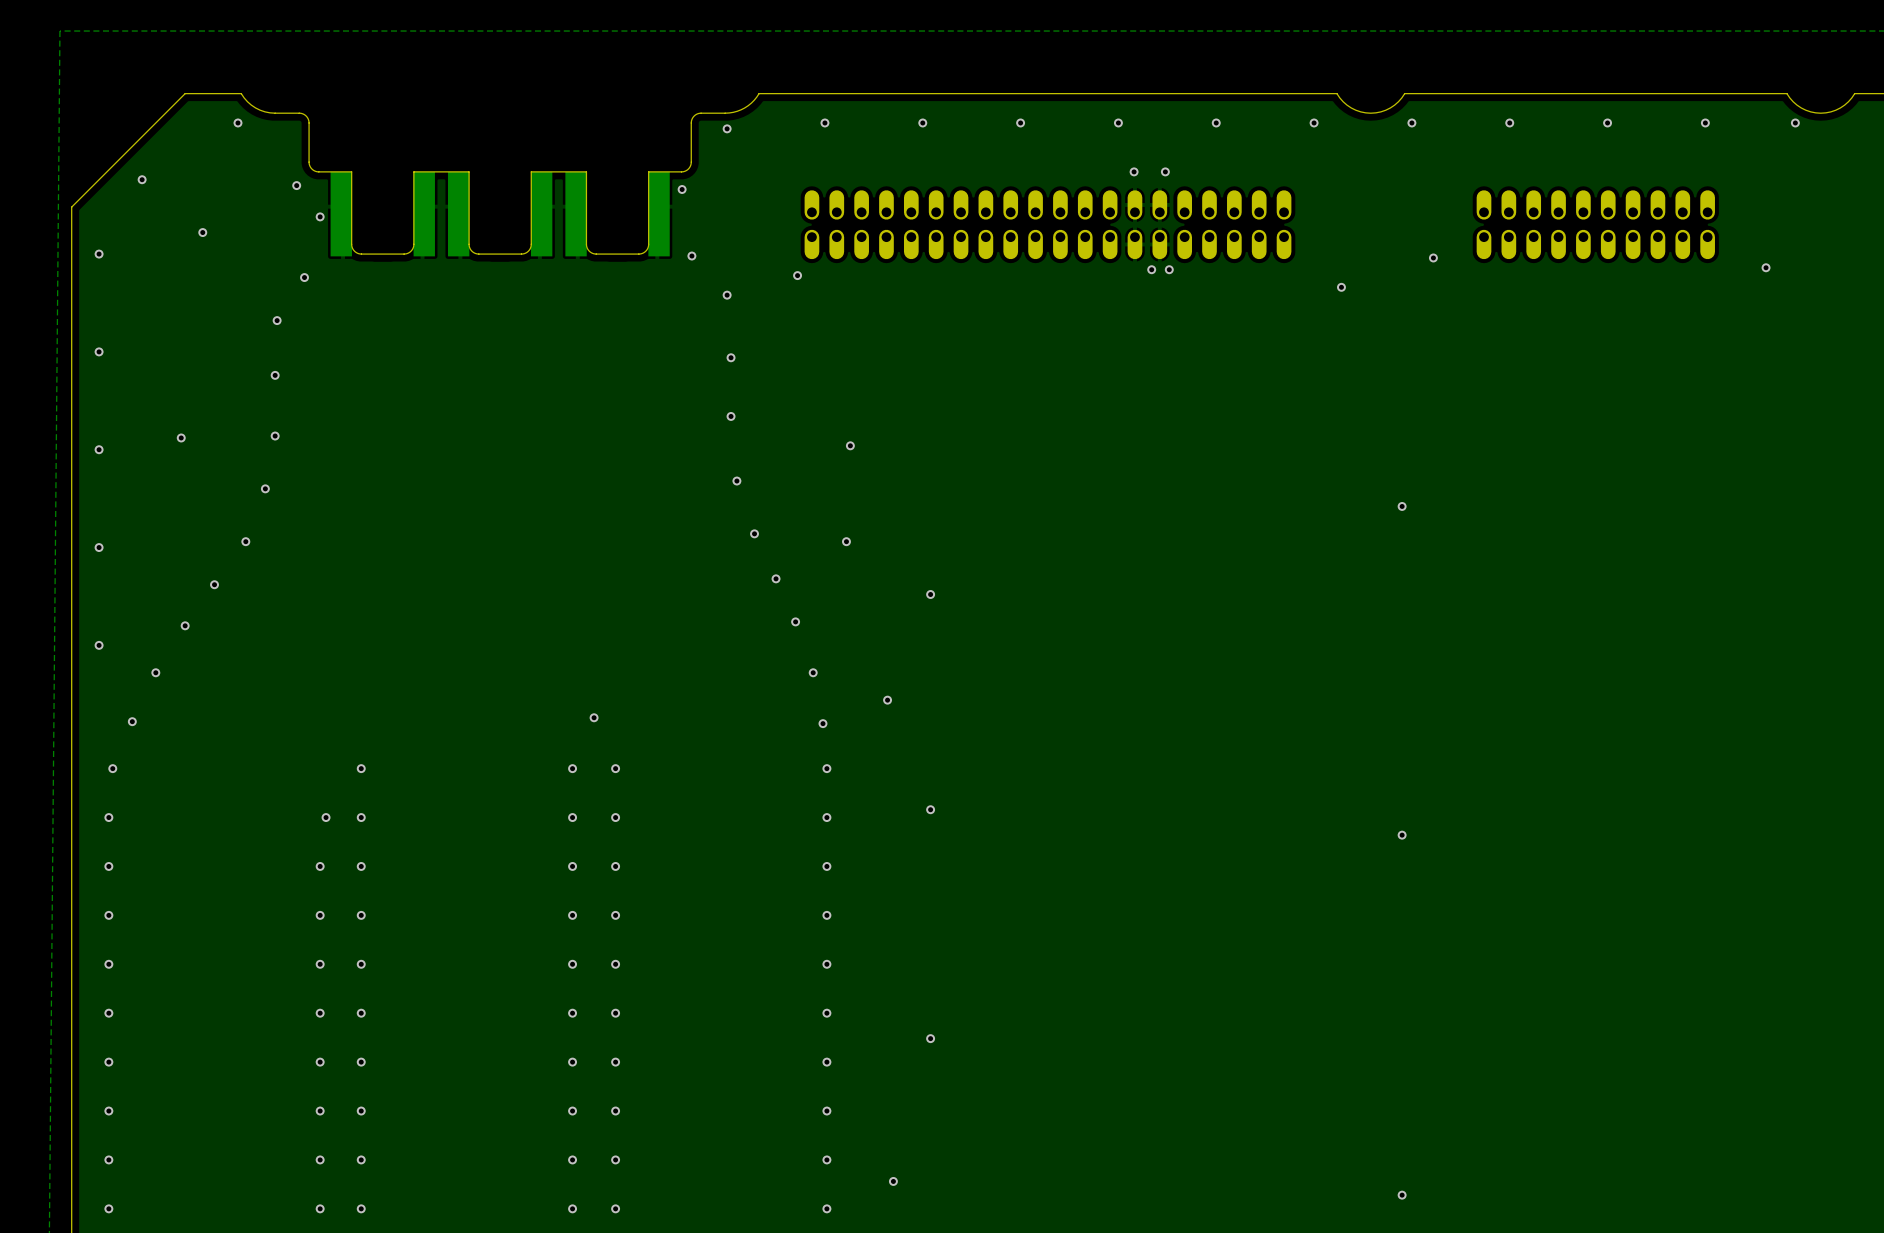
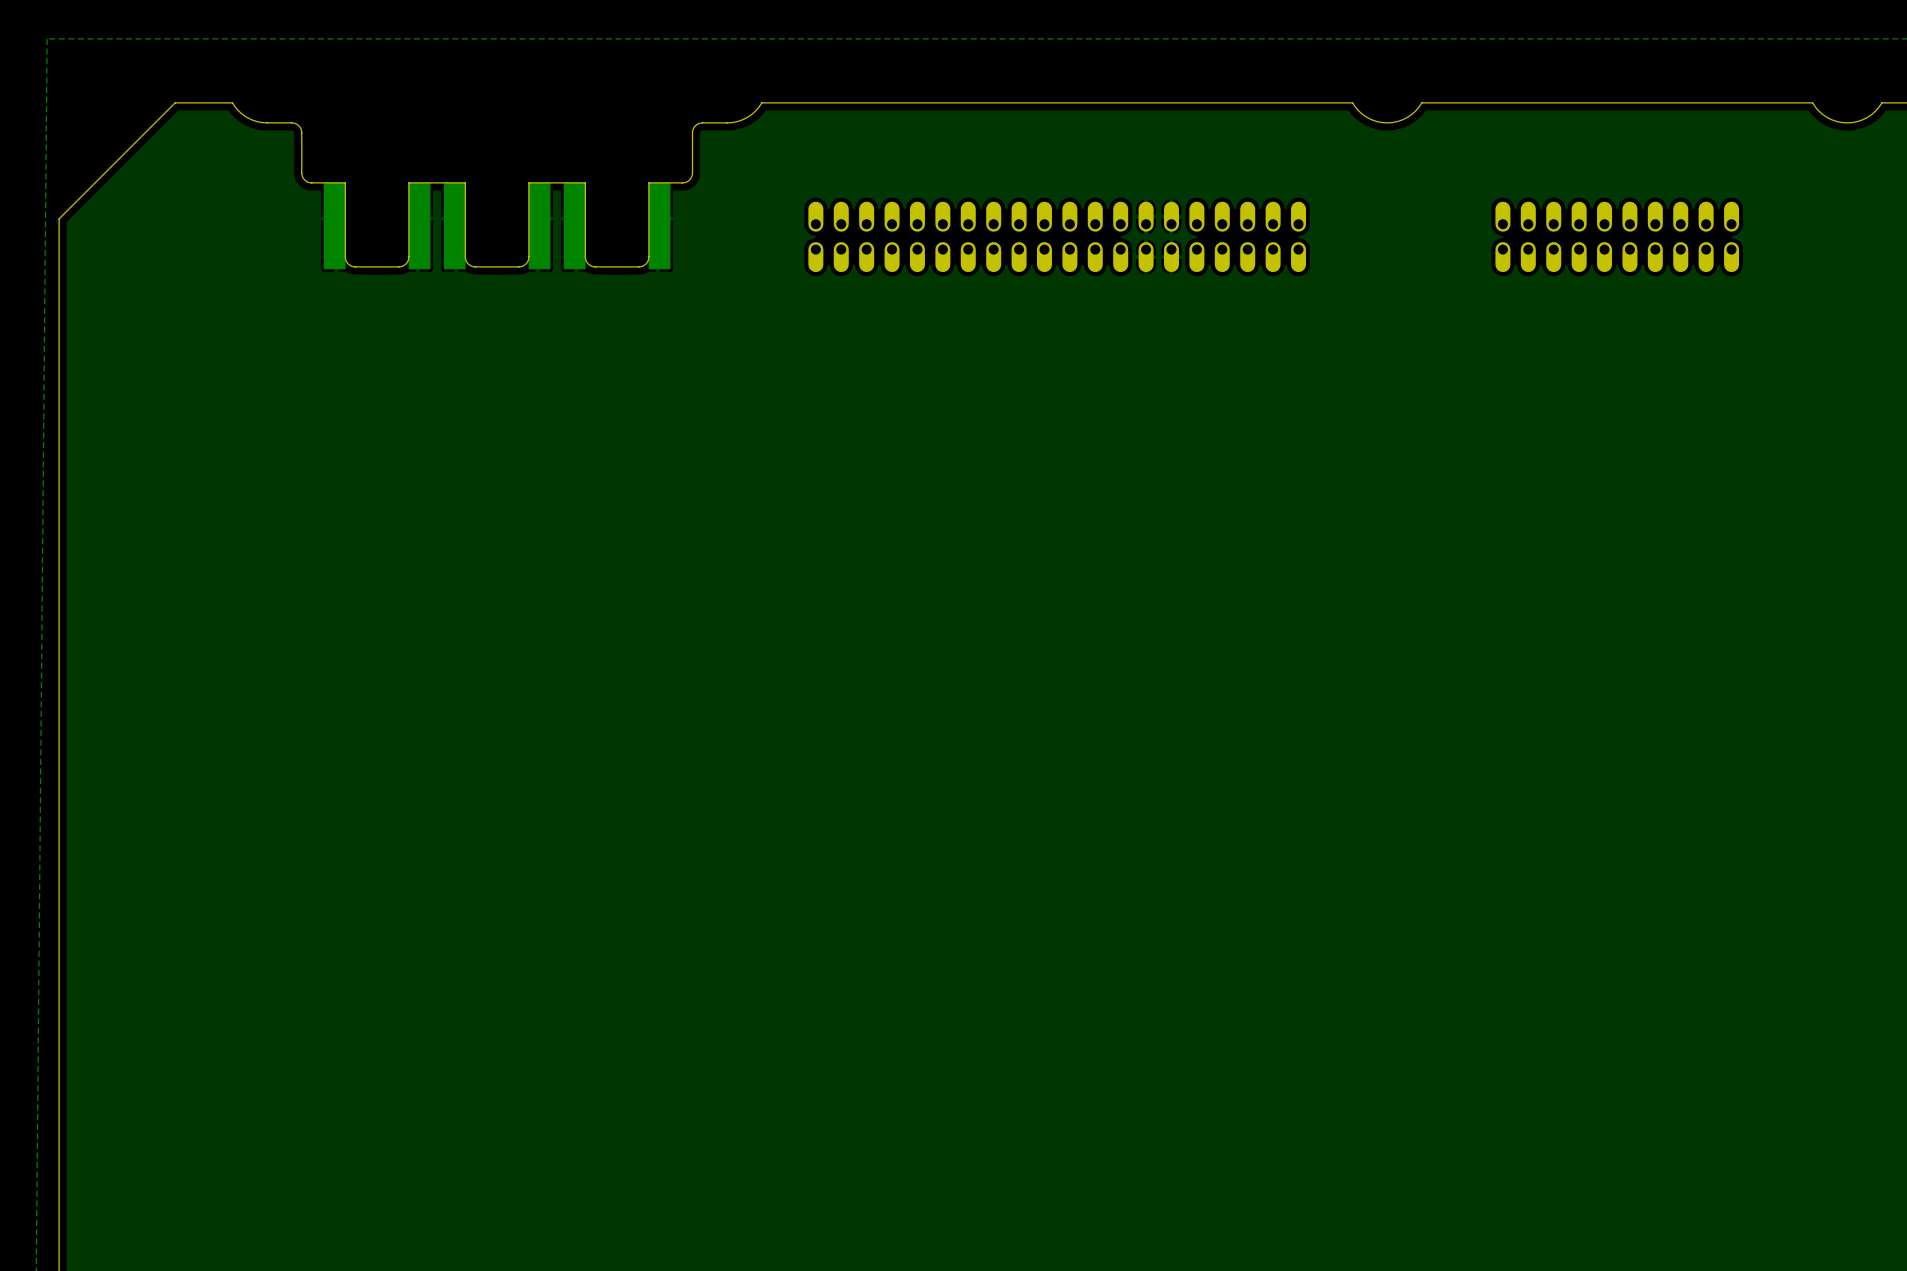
via: (237, 122) -> none
via: (824, 122) -> none
via: (922, 122) -> none
via: (1020, 122) -> none
via: (1118, 122) -> none
via: (1216, 122) -> none
via: (1314, 122) -> none
via: (1411, 122) -> none
via: (1509, 122) -> none
via: (1607, 122) -> none
via: (1705, 122) -> none
via: (1795, 122) -> none
via: (727, 128) -> none
via: (1134, 171) -> none
via: (1165, 171) -> none
via: (142, 179) -> none
via: (296, 185) -> none
via: (682, 189) -> none
via: (320, 216) -> none
via: (202, 232) -> none
via: (99, 254) -> none
via: (691, 256) -> none
via: (1433, 257) -> none
via: (1766, 267) -> none
via: (1151, 269) -> none
via: (1169, 269) -> none
via: (797, 275) -> none
via: (304, 277) -> none
via: (1341, 287) -> none
via: (727, 295) -> none
via: (277, 320) -> none
via: (99, 351) -> none
via: (731, 357) -> none
via: (275, 375) -> none
via: (731, 416) -> none
via: (275, 436) -> none
via: (181, 437) -> none
via: (850, 445) -> none
via: (99, 449) -> none
via: (736, 481) -> none
via: (265, 488) -> none
via: (1402, 506) -> none
via: (754, 533) -> none
via: (245, 541) -> none
via: (846, 541) -> none
via: (99, 547) -> none
via: (776, 578) -> none
via: (214, 584) -> none
via: (930, 594) -> none
via: (795, 621) -> none
via: (185, 625) -> none
via: (99, 645) -> none
via: (155, 672) -> none
via: (813, 672) -> none
via: (887, 700) -> none
via: (594, 717) -> none
via: (132, 721) -> none
via: (822, 723) -> none
via: (112, 768) -> none
via: (361, 768) -> none
via: (572, 768) -> none
via: (615, 768) -> none
via: (826, 768) -> none
via: (930, 809) -> none
via: (108, 817) -> none
via: (326, 817) -> none
via: (361, 817) -> none
via: (572, 817) -> none
via: (615, 817) -> none
via: (826, 817) -> none
via: (1402, 835) -> none
via: (108, 866) -> none
via: (320, 866) -> none
via: (361, 866) -> none
via: (572, 866) -> none
via: (615, 866) -> none
via: (826, 866) -> none
via: (108, 915) -> none
via: (320, 915) -> none
via: (361, 915) -> none
via: (572, 915) -> none
via: (615, 915) -> none
via: (826, 915) -> none
via: (108, 964) -> none
via: (320, 964) -> none
via: (361, 964) -> none
via: (572, 964) -> none
via: (615, 964) -> none
via: (826, 964) -> none
via: (108, 1013) -> none
via: (320, 1013) -> none
via: (361, 1013) -> none
via: (572, 1013) -> none
via: (615, 1013) -> none
via: (826, 1013) -> none
via: (930, 1038) -> none
via: (108, 1062) -> none
via: (320, 1062) -> none
via: (361, 1062) -> none
via: (572, 1062) -> none
via: (615, 1062) -> none
via: (826, 1062) -> none
via: (108, 1111) -> none
via: (320, 1111) -> none
via: (361, 1111) -> none
via: (572, 1111) -> none
via: (615, 1111) -> none
via: (826, 1111) -> none
via: (108, 1159) -> none
via: (320, 1159) -> none
via: (361, 1159) -> none
via: (572, 1159) -> none
via: (615, 1159) -> none
via: (826, 1159) -> none
via: (893, 1181) -> none
via: (1402, 1195) -> none
via: (108, 1208) -> none
via: (320, 1208) -> none
via: (361, 1208) -> none
via: (572, 1208) -> none
via: (615, 1208) -> none
via: (826, 1208) -> none

